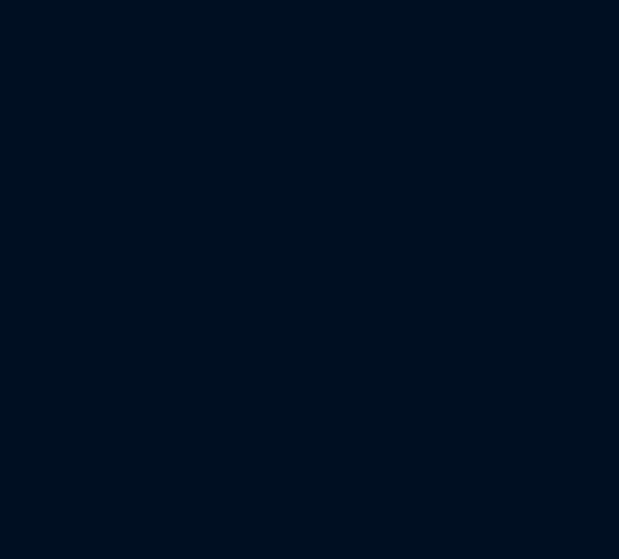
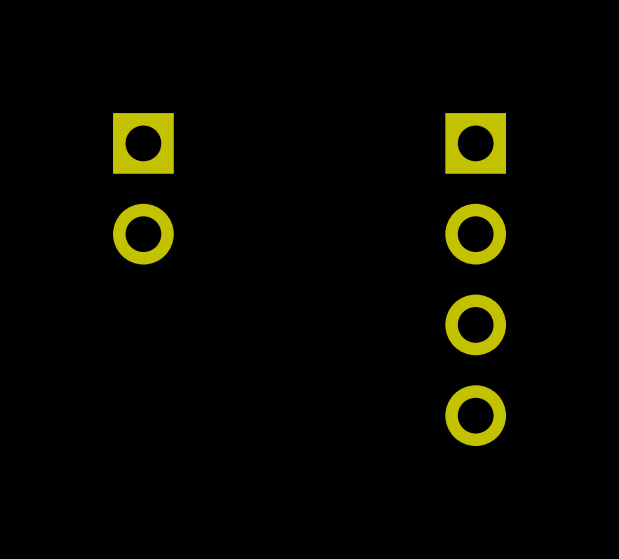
part: none -> (143, 188)
part: none -> (475, 279)

